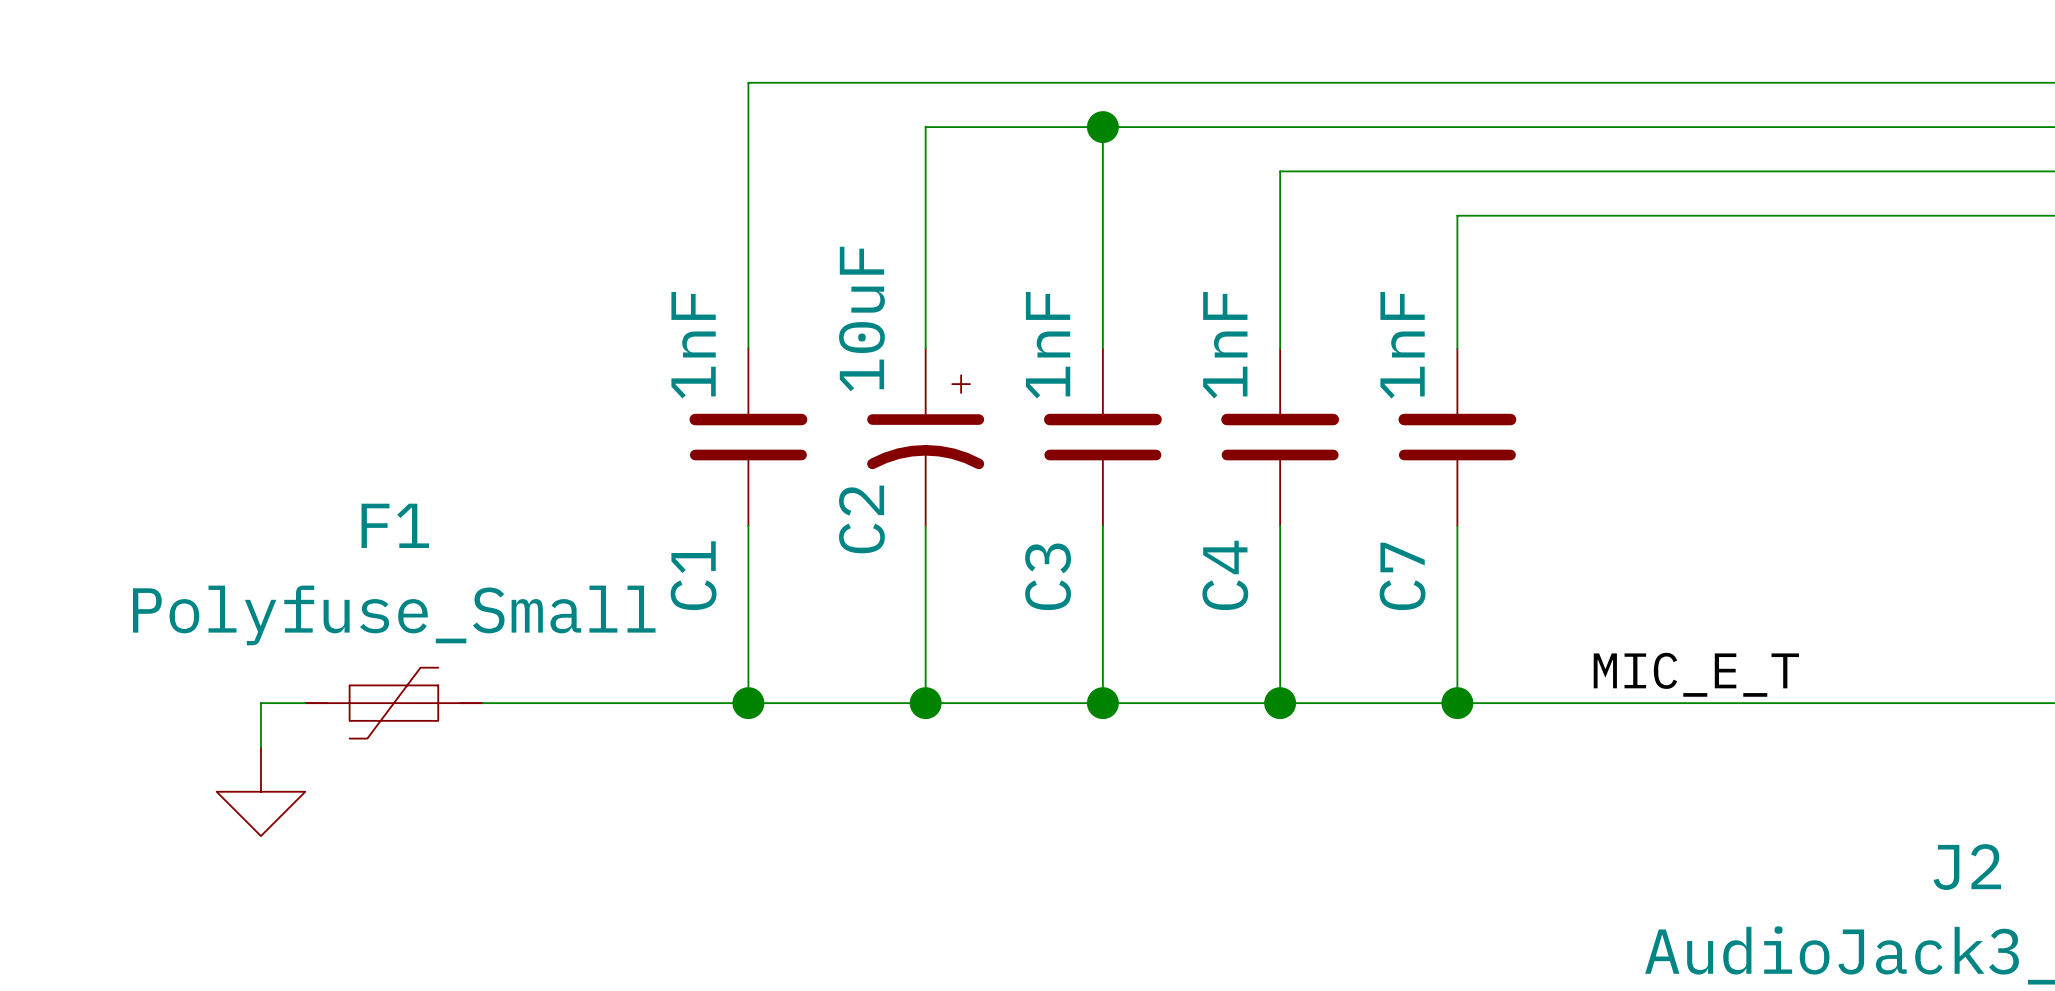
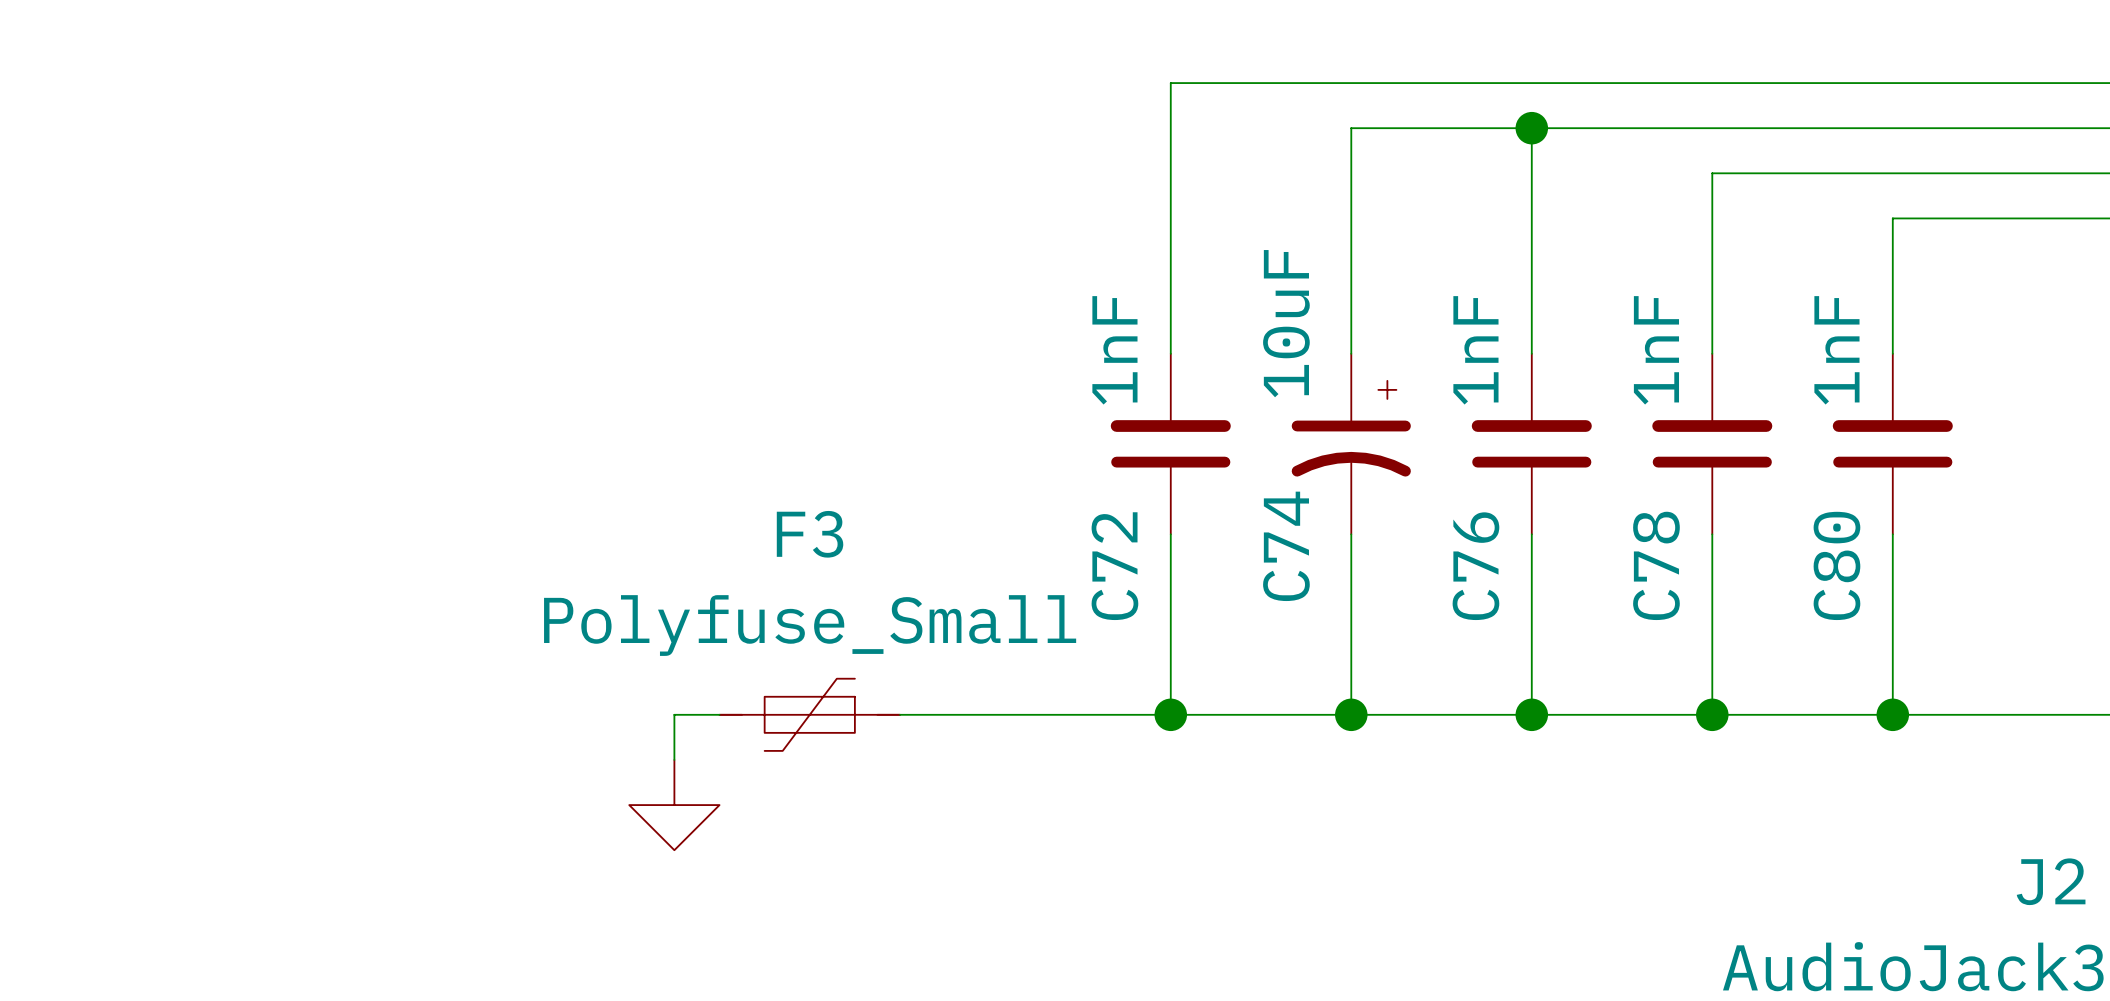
wire: (1102, 82) (748, 82) (748, 348) -> (1170, 83) (1170, 128)
junction: (1102, 127) -> none
wire: (1280, 127) (925, 127) (925, 348) -> none
junction: none -> (1531, 128)
wire: (1280, 171) (1634, 171) -> (1351, 173) (1351, 128)
wire: none -> (1712, 173) (1712, 353)
wire: (1457, 215) (1811, 215) -> (1531, 218) (1531, 128)
wire: none -> (1892, 218) (1892, 353)
C1: 1nF (748, 437) -> none
C2: 10uF (925, 437) -> none
C4: 1nF (1280, 437) -> none
C74: none -> 10uF (1351, 444)
C78: none -> 1nF (1712, 444)
C80: none -> 1nF (1892, 444)
wire: (748, 525) (748, 703) -> none
wire: (925, 525) (925, 703) -> (1712, 534) (1712, 714)
wire: none -> (1892, 534) (1892, 714)
C3 name: C3 (1048, 576) -> C72 (1114, 566)
C7 name: C7 (1402, 576) -> C76 (1475, 566)
label: MIC_E_T (1696, 674) -> none
wire: (305, 703) (260, 703) (260, 747) -> none
F1: Polyfuse_Small (393, 703) -> none
wire: (482, 703) (615, 703) -> (674, 759) (674, 714)
junction: (748, 703) -> none
F3: none -> Polyfuse_Small (809, 714)
junction: (925, 703) -> none
junction: none -> (1712, 714)
junction: none -> (1892, 714)
power symbol position: (260, 791) -> (674, 805)

